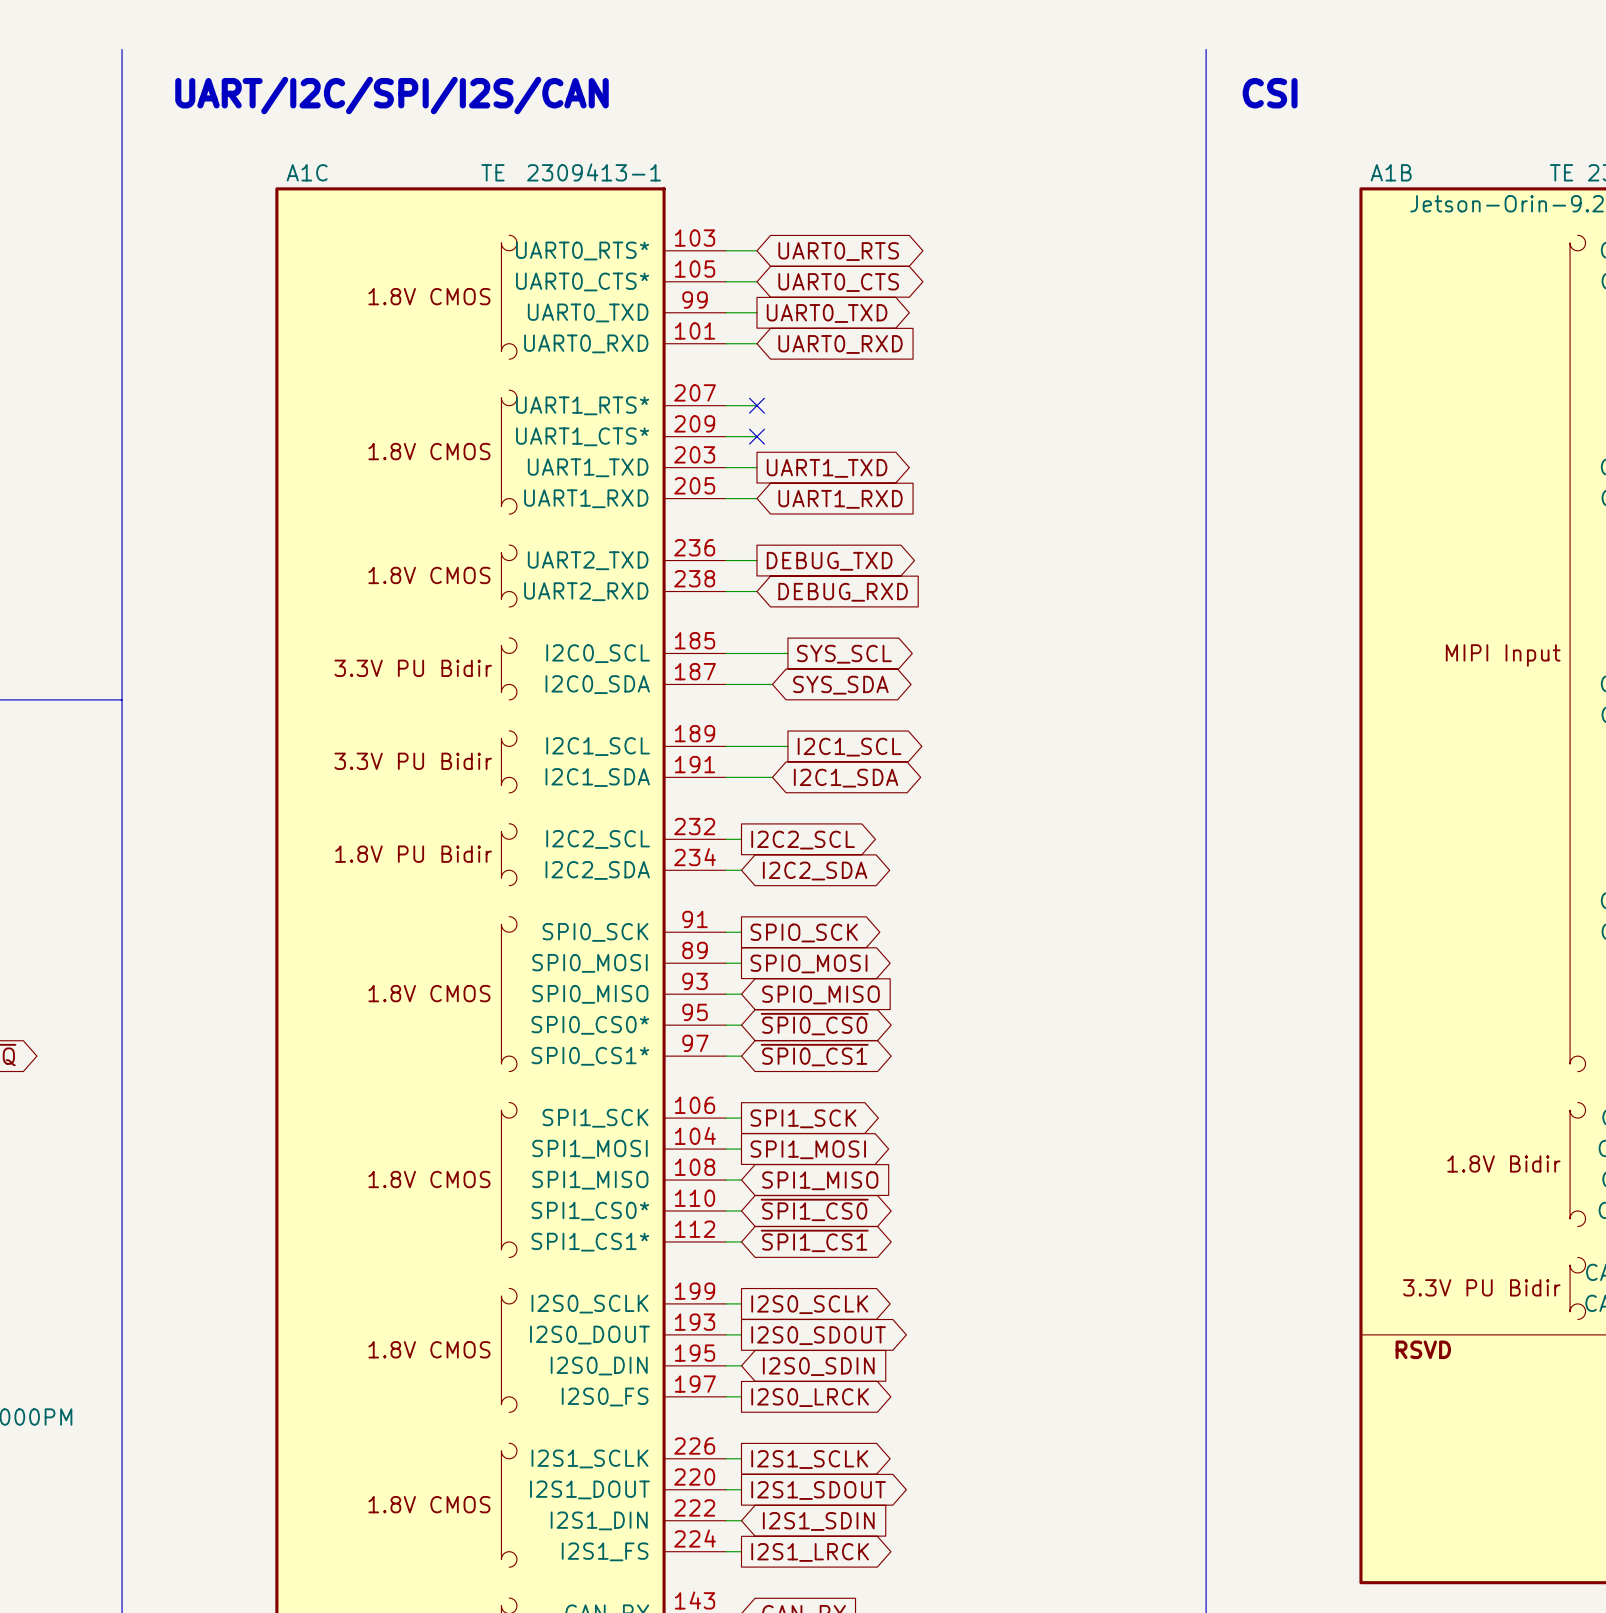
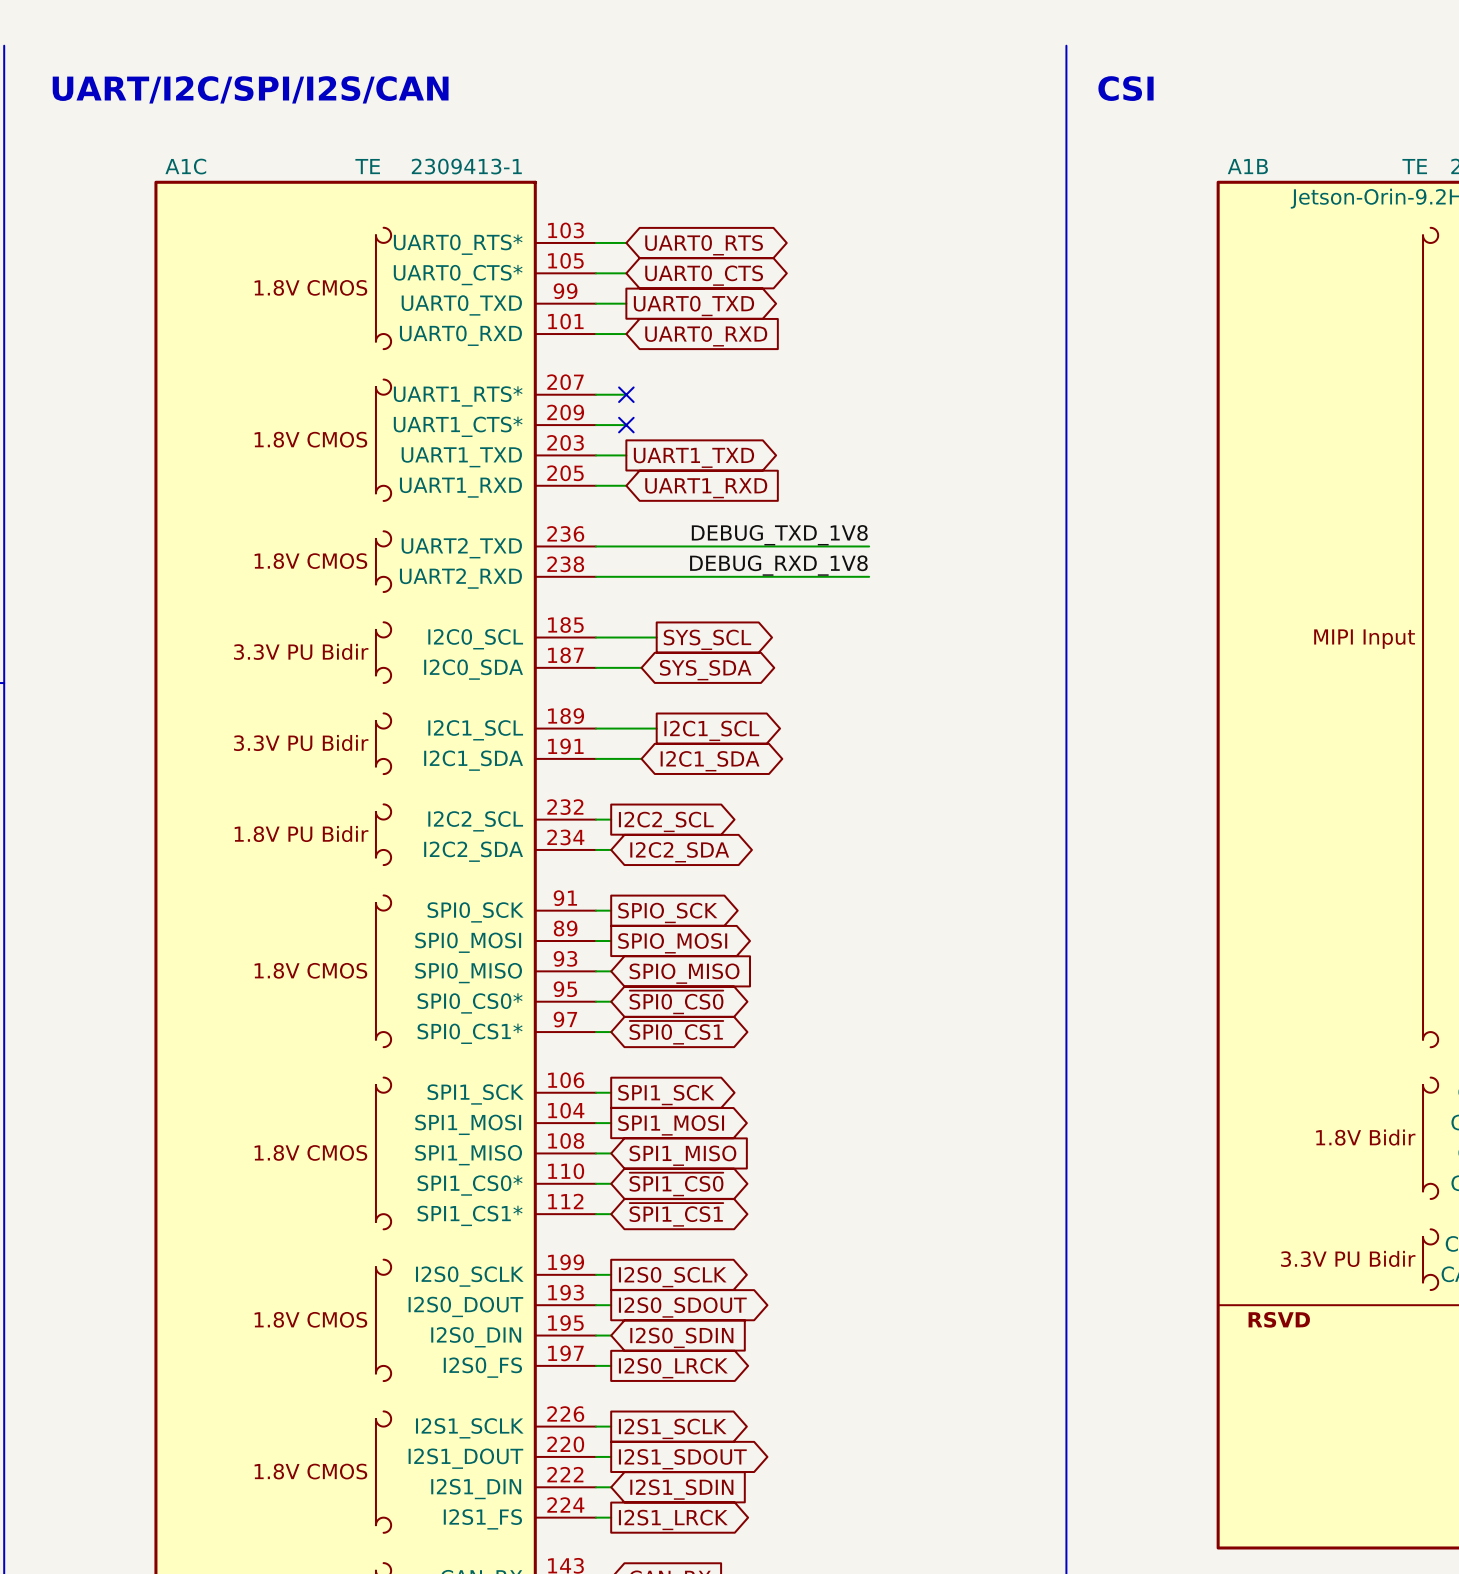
label: none -> DEBUG_TXD_1V8 (779, 535)
wire: none -> (626, 546) (869, 546)
global label: DEBUG_TXD (829, 561) -> none
label: none -> DEBUG_RXD_1V8 (778, 565)
wire: none -> (626, 576) (869, 576)
global label: DEBUG_RXD (843, 592) -> none

